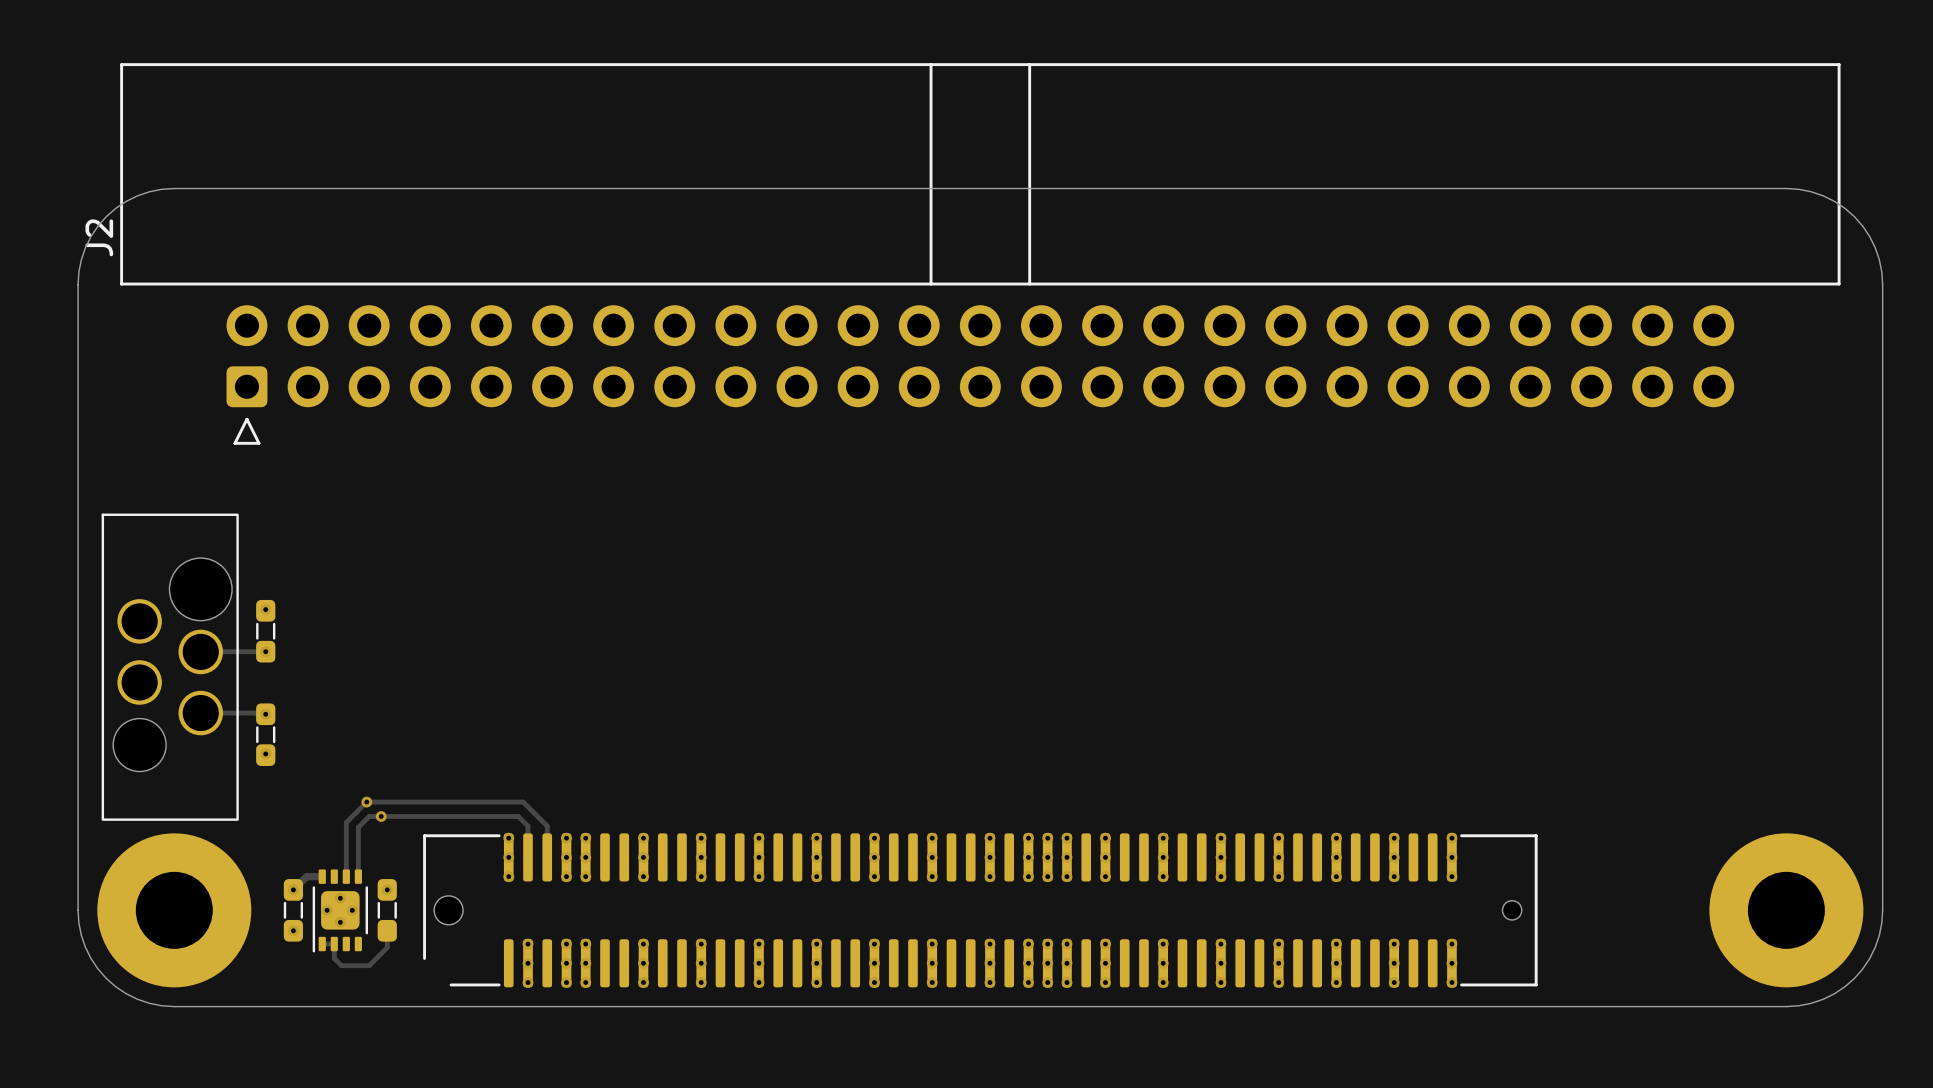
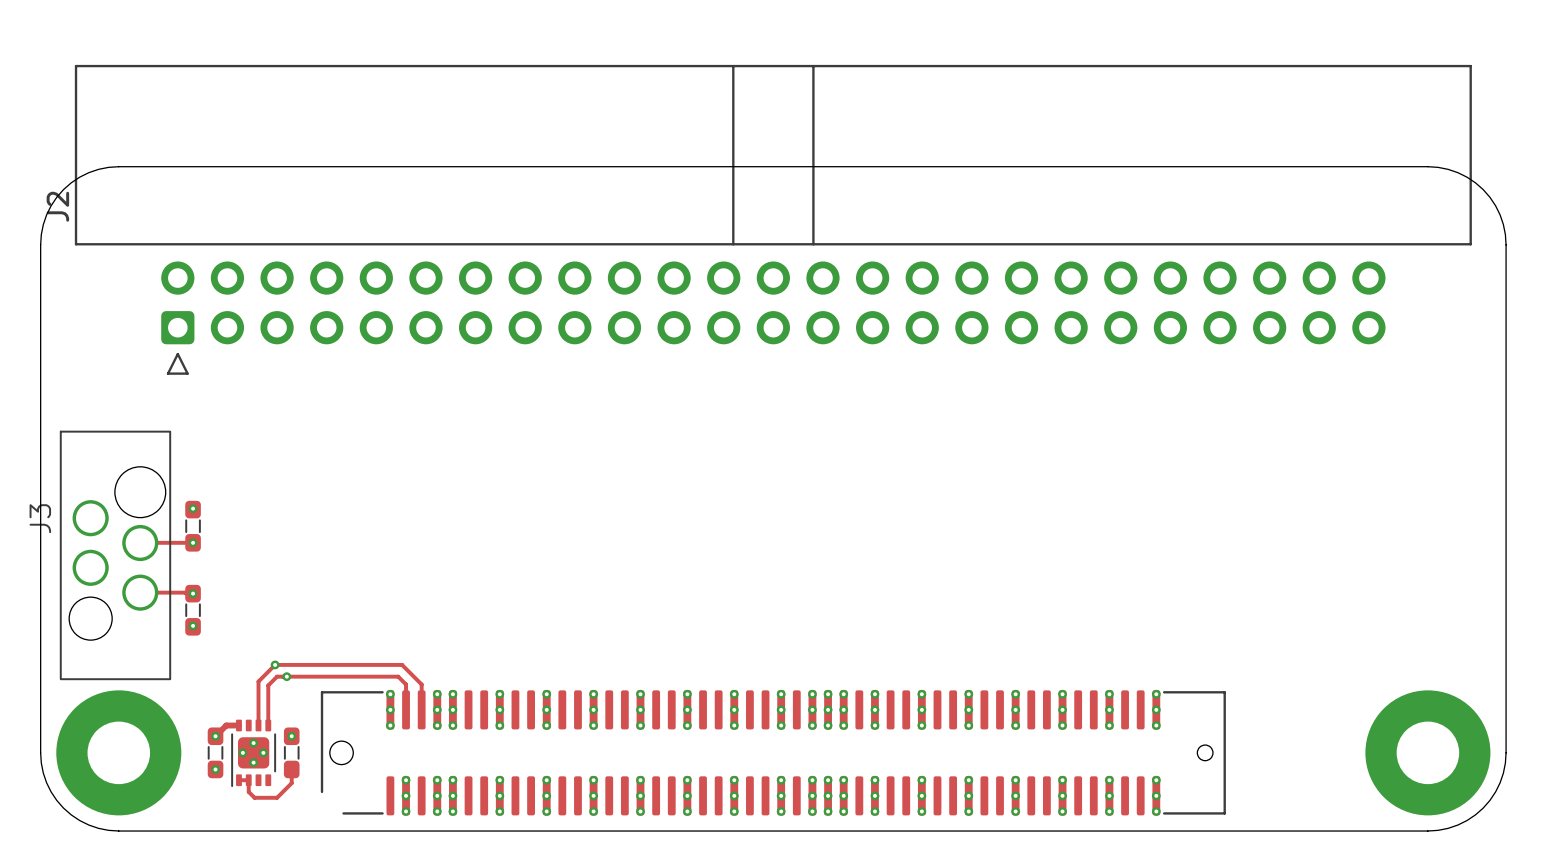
J3 name: none -> J3 (40, 518)

